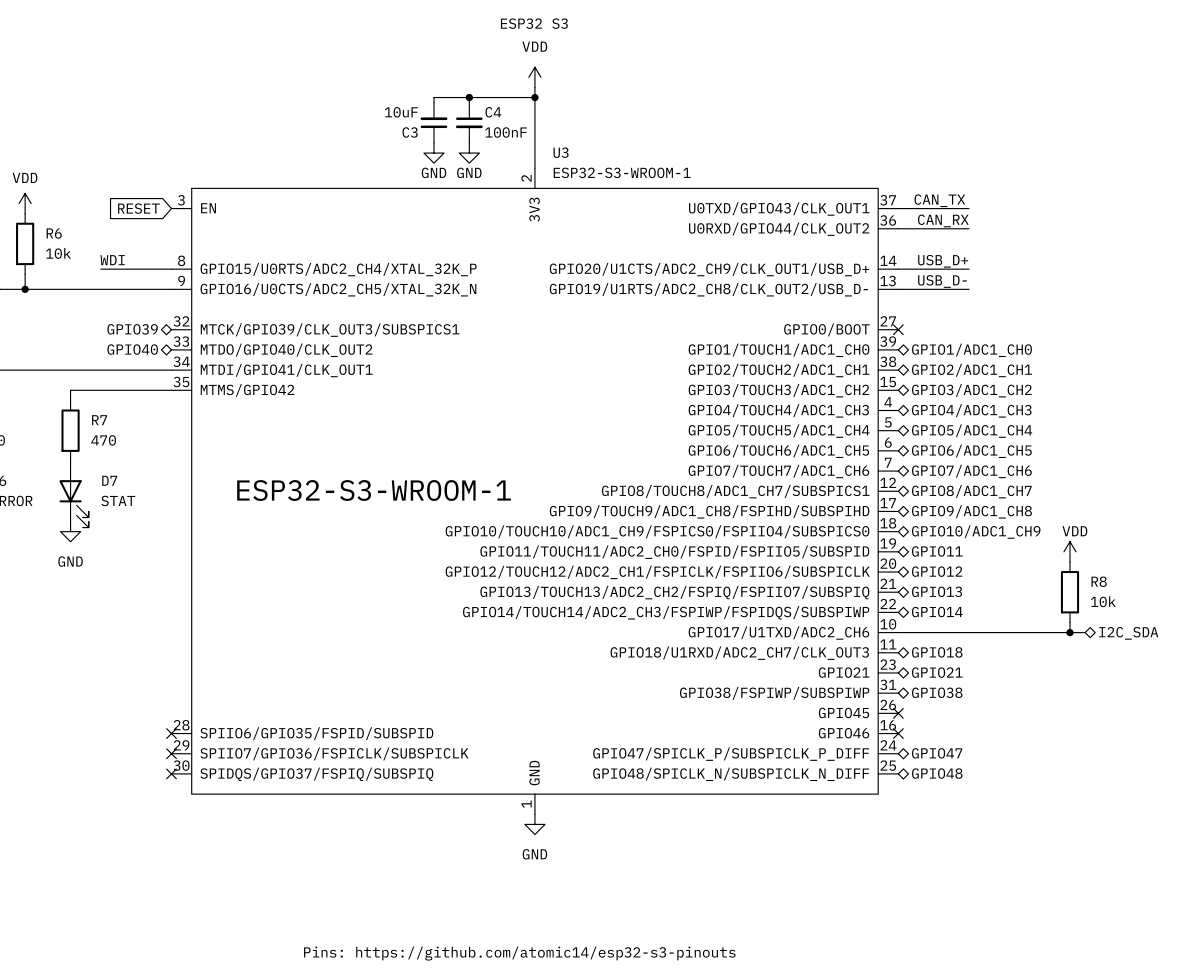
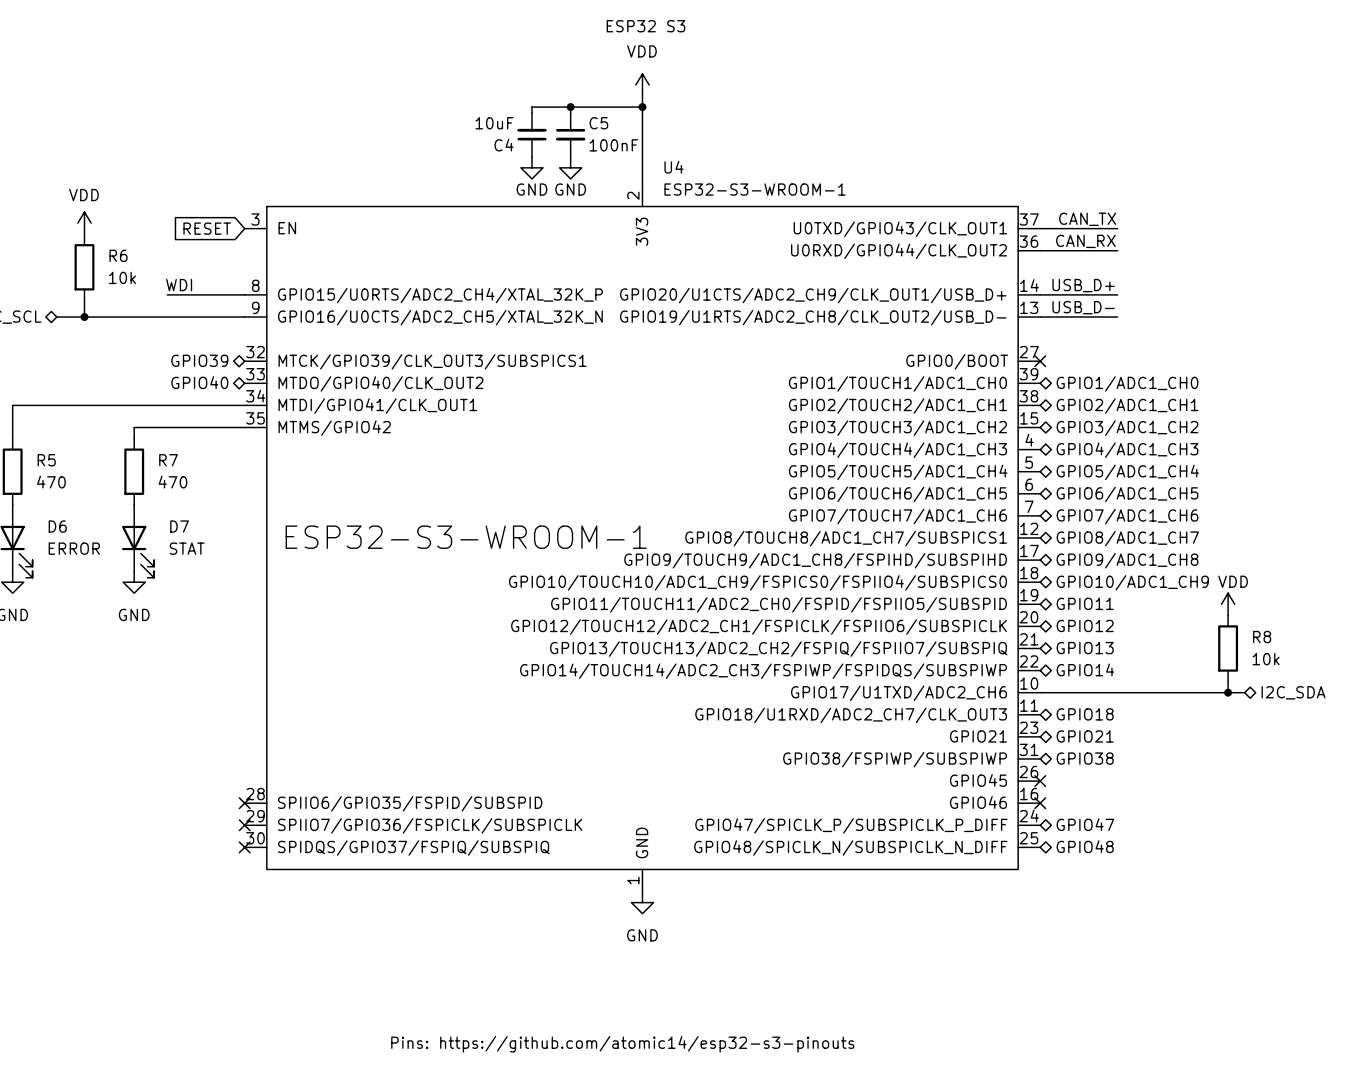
C4 name: C4 (493, 112) -> C5 (598, 123)
C3 name: C3 (410, 132) -> C4 (504, 145)
U3 name: U3 (561, 152) -> U4 (674, 167)

